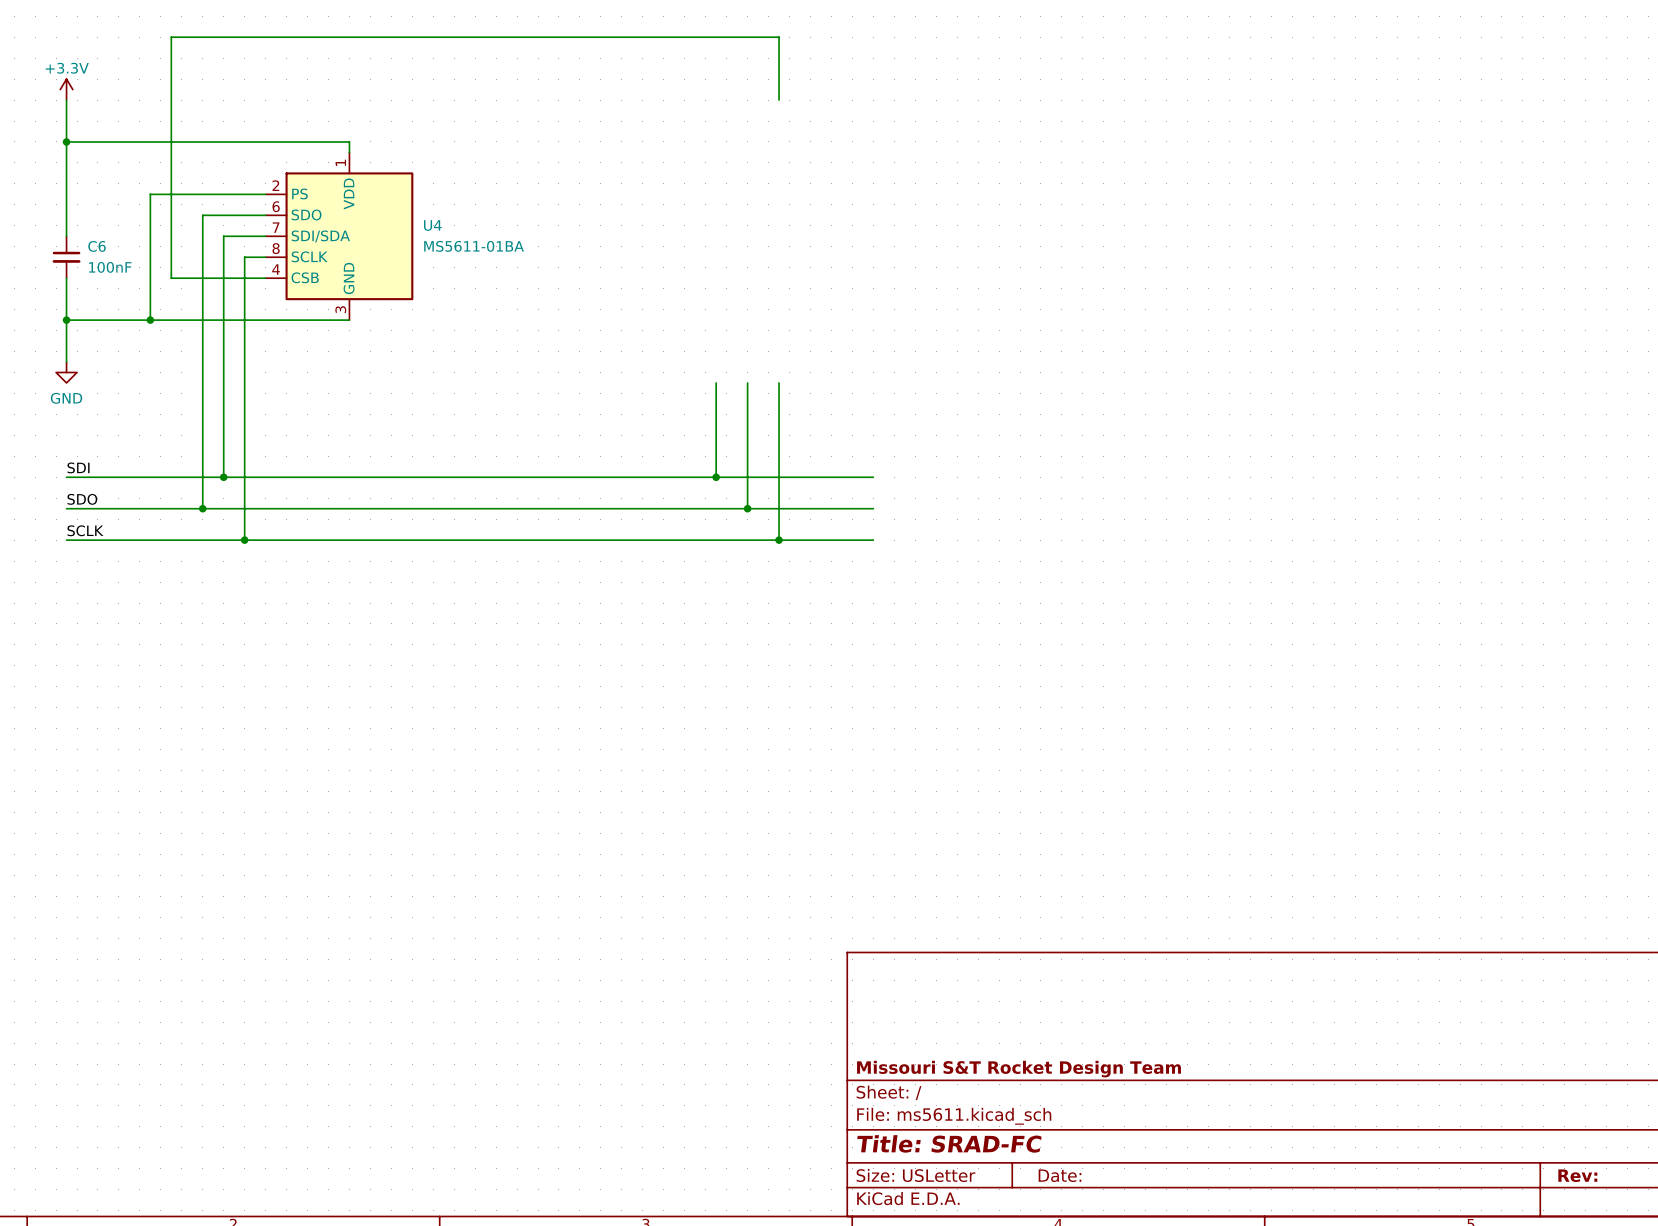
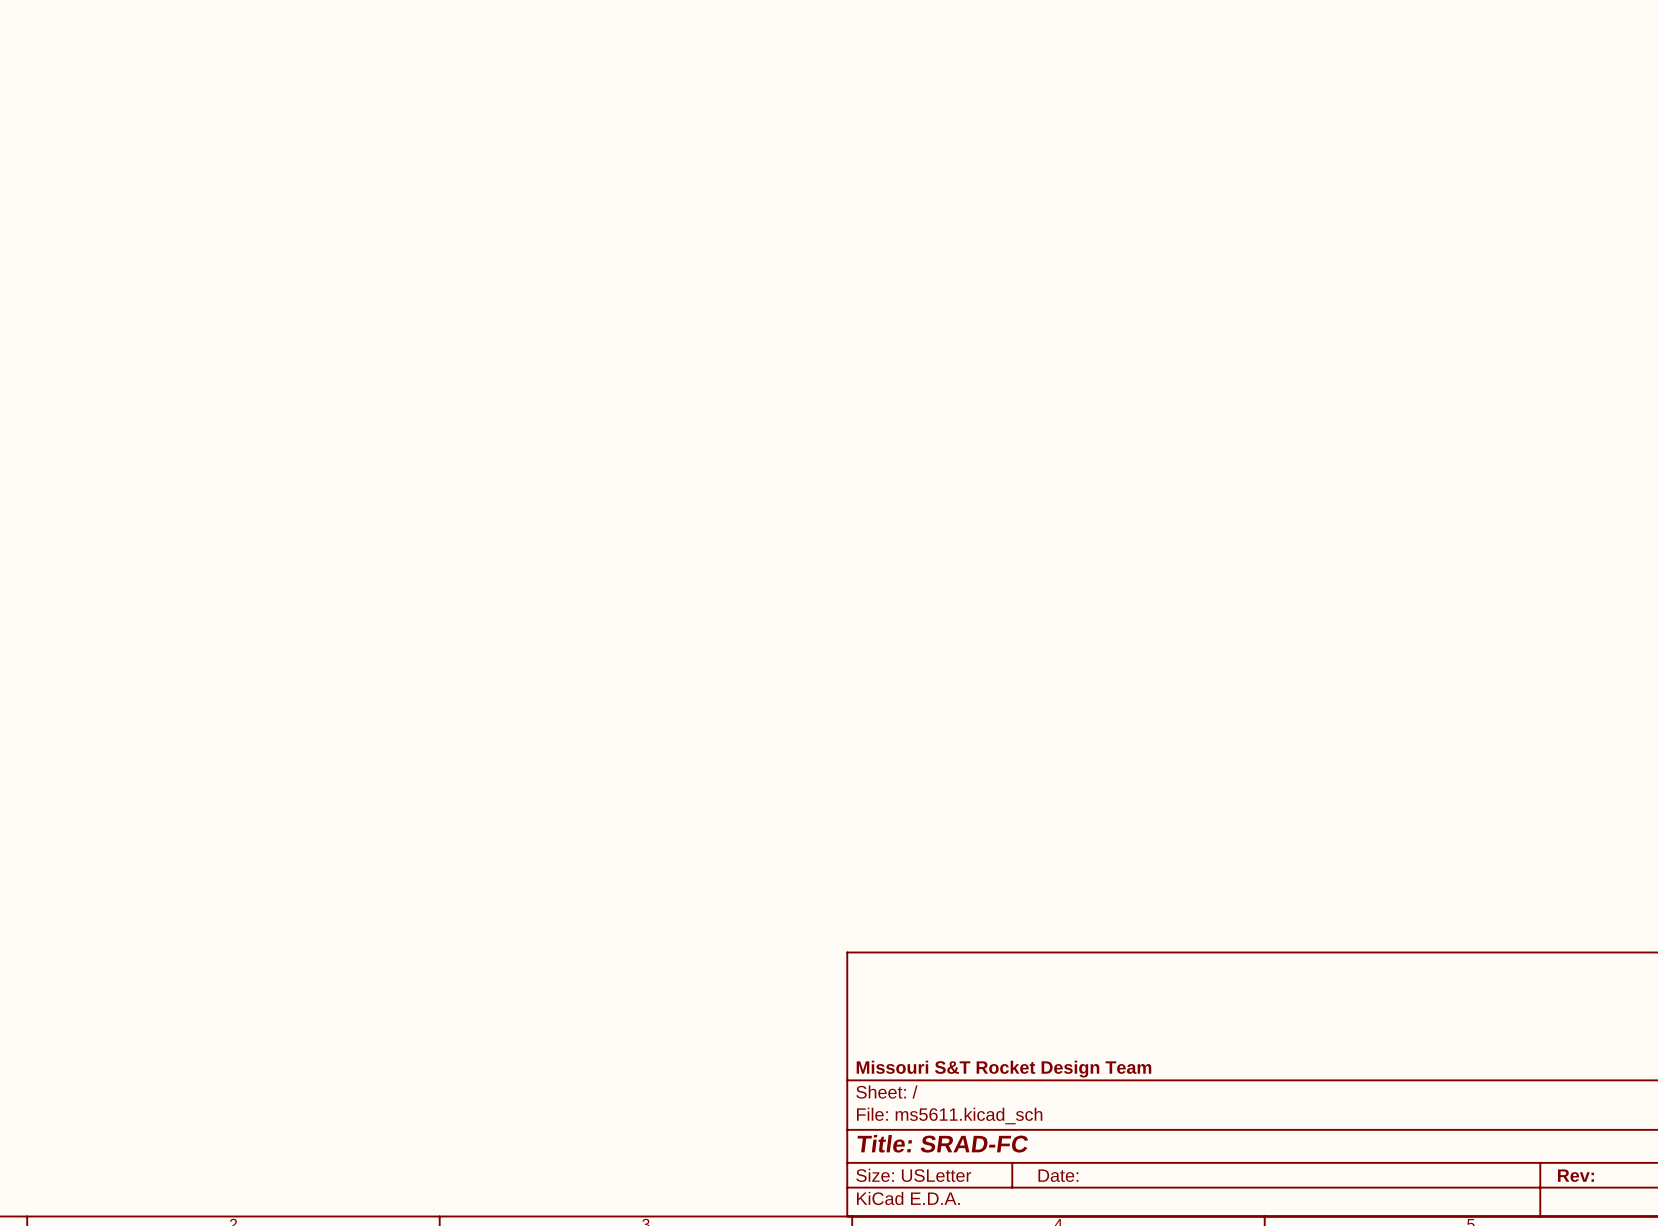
power symbol: +3.3V (66, 89) -> none
wire: (66, 100) (66, 236) -> none
wire: (779, 100) (779, 37) (171, 37) (171, 278) (265, 278) -> none
wire: (66, 141) (349, 141) (349, 152) -> none
junction: (66, 141) -> none
wire: (265, 194) (150, 194) (150, 320) -> none
wire: (265, 215) (202, 215) (202, 508) -> none
wire: (265, 236) (223, 236) (223, 477) -> none
U4: MS5611-01BA (339, 236) -> none
C6: 100nF (66, 257) -> none
wire: (265, 257) (244, 257) (244, 540) -> none
wire: (66, 278) (66, 362) -> none
wire: (66, 320) (349, 320) -> none
junction: (66, 320) -> none
junction: (150, 320) -> none
power symbol: GND (66, 372) -> none
wire: (716, 382) (716, 477) -> none
wire: (747, 382) (747, 508) -> none
wire: (779, 382) (779, 540) -> none
label: SDI (78, 467) -> none
wire: (66, 477) (873, 477) -> none
junction: (223, 477) -> none
junction: (716, 477) -> none
label: SDO (82, 499) -> none
wire: (66, 508) (873, 508) -> none
junction: (202, 508) -> none
junction: (747, 508) -> none
label: SCLK (85, 530) -> none
wire: (66, 540) (873, 540) -> none
junction: (244, 540) -> none
junction: (779, 540) -> none

